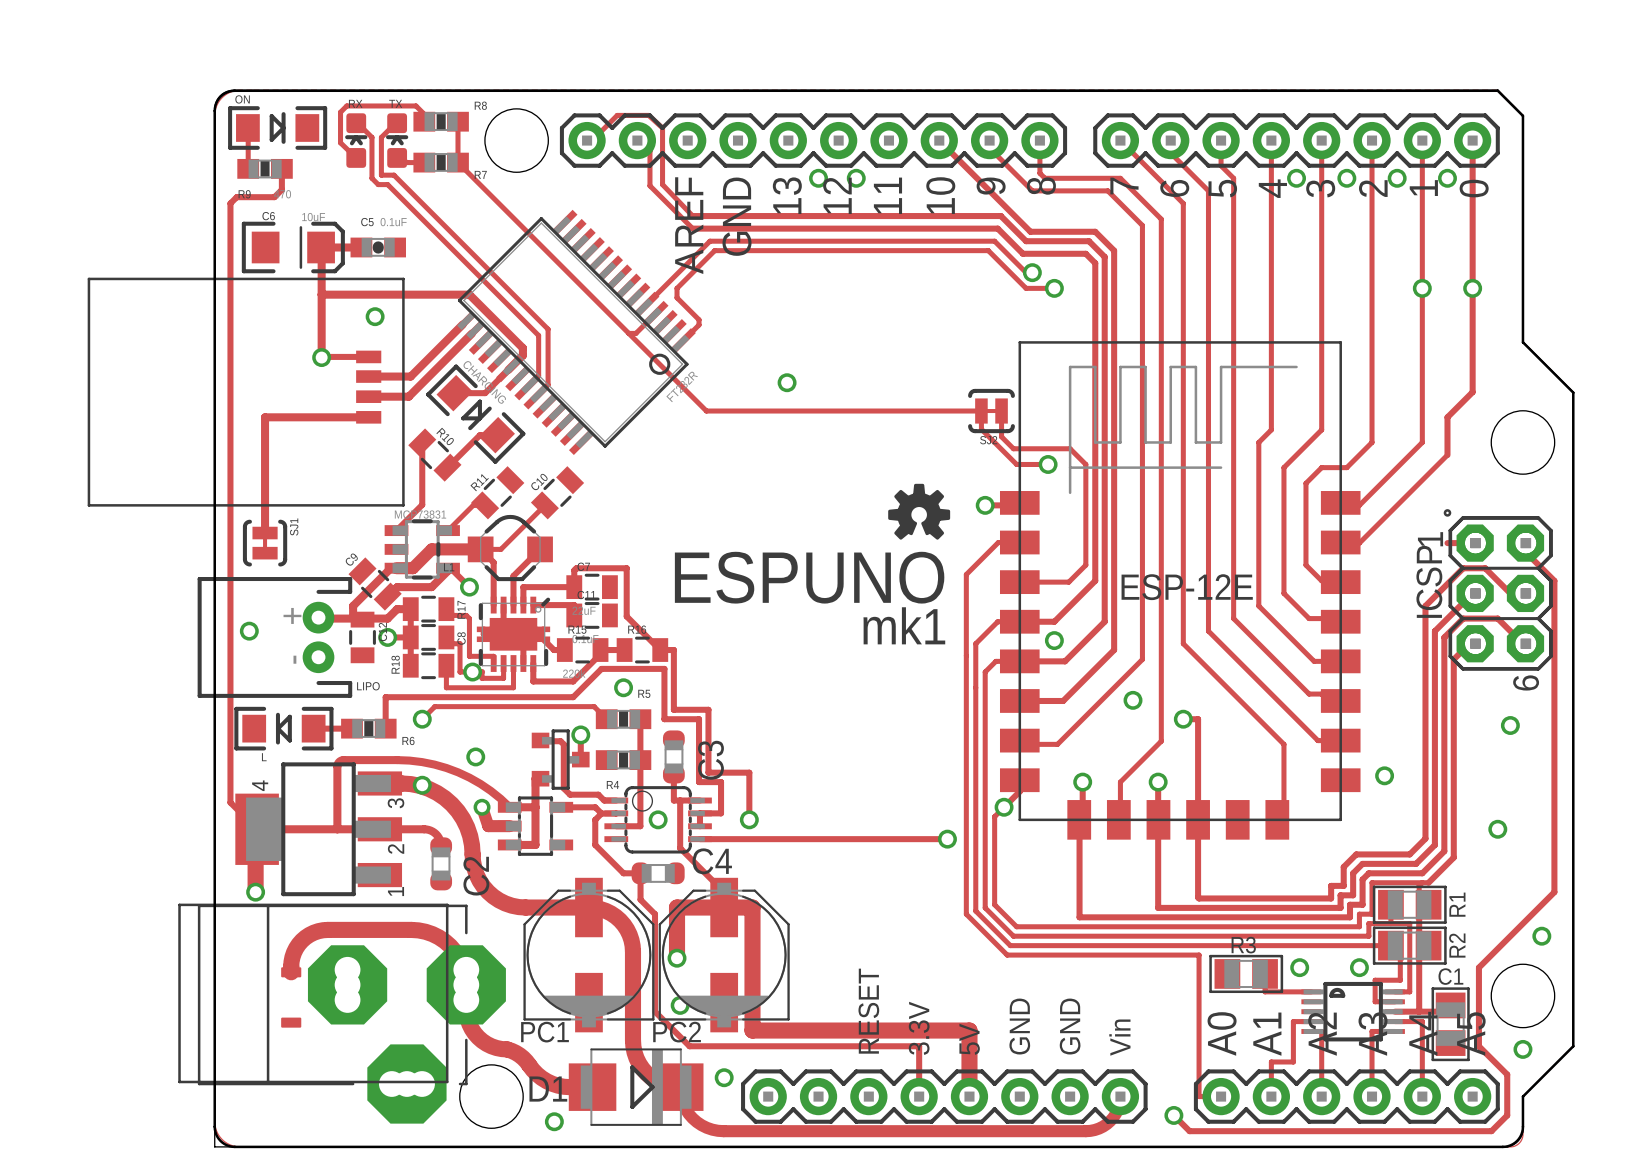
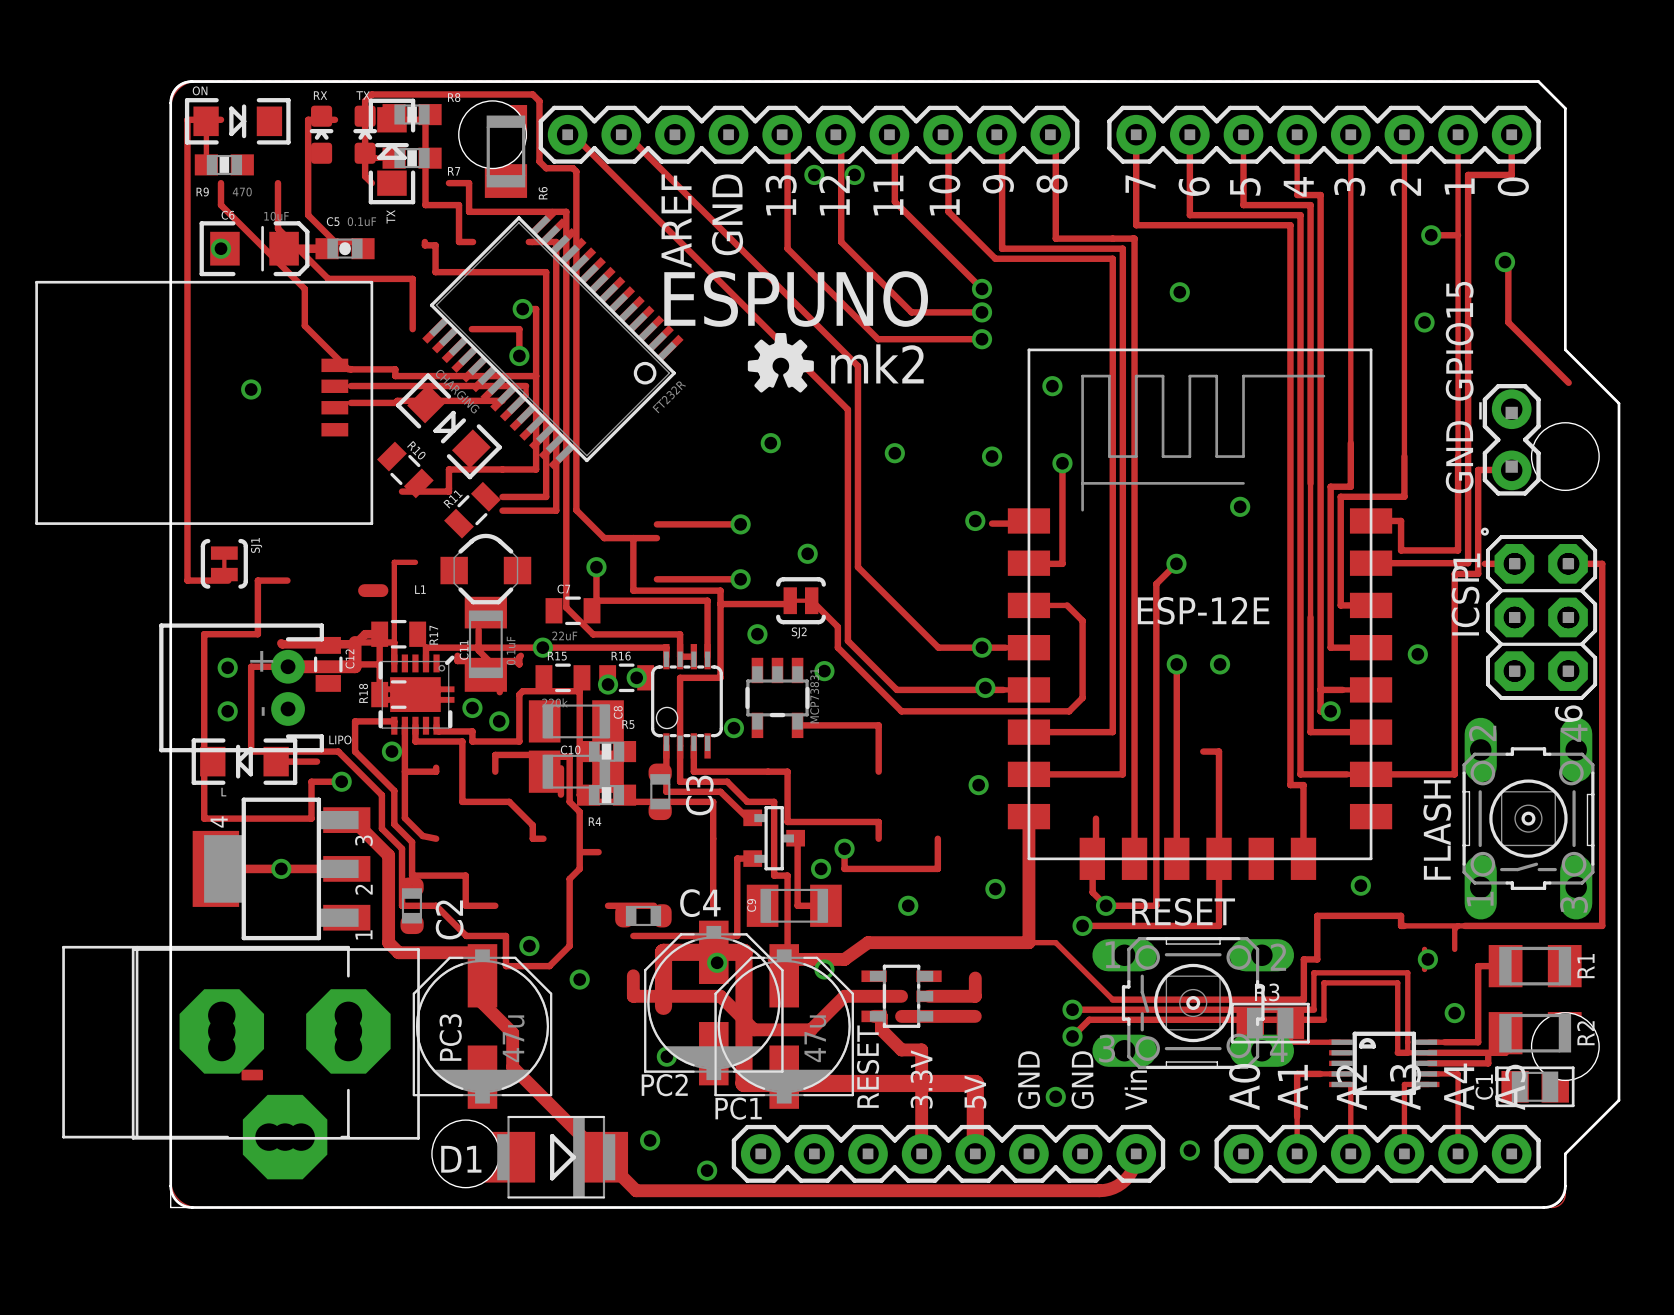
track: (424, 121) (424, 114) (416, 105) (346, 105) (340, 112) (340, 142) (356, 157) -> none
track: (457, 121) (457, 162) (706, 411) (981, 411) (981, 429) (1016, 464) (1048, 464) -> none
track: (357, 122) (371, 137) (371, 178) (378, 184) (387, 184) (538, 335) (538, 376) (526, 388) -> none
track: (397, 123) (381, 137) (381, 175) (393, 175) (548, 329) (548, 376) -> (350, 386) (526, 386)
track: none -> (334, 119) (308, 119) (308, 215) (334, 241) (365, 241)
track: none -> (391, 119) (425, 119) (425, 205) (459, 205) (459, 241) (473, 241)
track: (587, 140) (592, 140) (617, 115) (648, 115) (662, 127) (662, 184) (692, 216) (1000, 216) (1026, 241) (1088, 241) (1104, 256) (1104, 621) (1065, 661) (1019, 661) -> none
track: none -> (573, 134) (847, 409) (847, 640) (896, 689) (1003, 689)
track: (637, 140) (649, 151) (649, 185) (692, 228) (997, 228) (1022, 253) (1085, 253) (1095, 263) (1095, 580) (1054, 621) (1019, 621) -> none
track: none -> (787, 134) (787, 248) (878, 339) (982, 339)
track: none -> (841, 134) (841, 241) (911, 312) (982, 312)
track: none -> (894, 134) (894, 201) (982, 288)
track: (939, 140) (1030, 231) (1095, 231) (1114, 250) (1114, 650) (1063, 700) -> (948, 134) (948, 211) (995, 258) (1112, 258) (1112, 732) (1075, 732)
track: (989, 140) (989, 148) (1032, 190) (1107, 190) (1142, 225) (1142, 659) (1057, 744) (1023, 744) (1019, 740) -> (1002, 134) (1002, 248) (1122, 248) (1122, 774) (1028, 774)
track: (1039, 140) (1039, 173) (1044, 178) (1120, 178) (1161, 219) (1161, 741) (1120, 782) (1120, 818) (1118, 819) -> (1055, 134) (1055, 238) (1134, 238) (1134, 858)
track: (1120, 140) (1183, 203) (1183, 643) (1283, 744) (1283, 813) (1277, 819) -> (1136, 134) (1136, 225) (1290, 225) (1290, 785) (1303, 785) (1303, 858)
track: (1170, 153) (1208, 190) (1208, 631) (1317, 740) -> (1189, 148) (1189, 215) (1300, 215) (1300, 774) (1346, 774)
TX: none -> (391, 151)
track: (1221, 165) (1233, 178) (1233, 618) (1309, 694) (1321, 694) (1328, 700) -> (1243, 161) (1243, 205) (1310, 205) (1310, 483)
track: (281, 168) (281, 189) (274, 197) (236, 197) (230, 203) -> (220, 119) (187, 119) (187, 201)
via: (1296, 178) -> none
via: (1346, 178) -> none
via: (1397, 178) -> none
via: (1447, 178) -> none
track: (1472, 178) (1472, 392) (1447, 417) (1447, 455) (1359, 543) (1340, 542) -> (1511, 174) (1468, 174) (1468, 563) (1371, 563)
track: none -> (220, 183) (220, 205) (304, 288) (304, 325) (348, 369) (350, 369)
track: none -> (277, 183) (277, 228) (328, 278) (412, 278) (412, 329)
track: none -> (371, 183) (365, 176) (365, 101) (371, 94) (532, 94) (539, 101) (539, 161) (546, 168) (573, 168) (576, 171) (576, 510) (604, 538) (656, 538)
track: none -> (448, 183) (469, 183) (469, 211) (566, 211) (566, 607)
track: (1271, 197) (1271, 429) (1258, 442) (1258, 606) (1314, 661) -> (1297, 195) (1320, 195) (1320, 711) (1330, 711)
track: none -> (1431, 235) (1458, 235)
via: none -> (1431, 235)
track: none -> (424, 241) (424, 245) (435, 245) (435, 272) (546, 272) (546, 496) (502, 496)
track: none -> (528, 241) (556, 241) (556, 510) (502, 510)
via: none -> (220, 248)
track: (321, 247) (321, 356) -> none
track: none -> (1505, 262) (1508, 265) (1508, 322) (1568, 382)
via: none -> (1505, 262)
track: (1032, 272) (1026, 272) (994, 241) (709, 241) (647, 303) -> none
via: (1032, 272) -> none
via: none -> (982, 288)
track: (1054, 288) (1026, 288) (988, 250) (714, 250) (677, 288) (677, 297) (699, 319) (699, 324) (683, 340) -> none
via: (1054, 288) -> none
via: none -> (1179, 292)
via: (1422, 288) -> none
via: (1472, 288) -> none
track: (321, 294) (469, 294) (522, 348) (522, 355) (485, 393) (454, 393) -> none
track: none -> (522, 309) (536, 309) (536, 469) (448, 469) (448, 491) (402, 491)
via: none -> (522, 309)
via: none -> (982, 312)
track: (656, 313) (635, 333) (628, 333) -> none
via: (375, 316) -> none
via: none -> (1424, 322)
track: none -> (471, 329) (519, 329) (519, 355)
track: (462, 324) (410, 376) (368, 376) -> none
via: none -> (982, 339)
track: (471, 333) (408, 396) (368, 396) -> none
via: none -> (519, 355)
text: none -> mk2 (877, 363)
track: (321, 356) (368, 356) -> none
via position: (321, 357) -> (251, 389)
track: none -> (350, 369) (395, 369) (395, 376) (536, 376)
via: none -> (1052, 386)
via position: (787, 382) -> (770, 443)
track: none -> (502, 400) (350, 402)
SJ2 position: (991, 411) -> (800, 600)
track: (1001, 411) (1001, 436) (1013, 448) (1070, 448) (1085, 464) (1085, 565) (1068, 582) (1055, 582) -> (811, 605) (811, 600) (837, 626) (837, 647) (901, 711) (1069, 711) (1082, 697) (1082, 620) (1067, 605)
track: (368, 417) (265, 417) (265, 533) -> none
GND_GPIO15: none -> (1511, 439)
track: (1321, 429) (1283, 467) -> (1350, 443) (1350, 486) (1330, 486) (1330, 647) (1371, 647)
track: (496, 435) (479, 435) (447, 467) -> none
via: none -> (894, 453)
track: (422, 442) (422, 504) (396, 530) -> none
via: none -> (992, 456)
track: (1372, 442) (1346, 467) (1321, 467) (1305, 483) (1305, 565) (1321, 580) (1340, 582) -> (1404, 456) (1404, 496) (1340, 496) (1340, 605) (1371, 605)
track: (1422, 442) (1359, 505) (1343, 505) (1340, 502) -> (1458, 456) (1458, 550) (1401, 550) (1401, 520) (1371, 520)
track: none -> (1511, 469) (1478, 469) (1478, 573) (1454, 573) (1454, 774) (1371, 774)
via position: (1048, 464) -> (1062, 463)
C10 footprint: [530, 466, 585, 520] -> [528, 750, 624, 793]
via: none -> (1240, 506)
track: (485, 505) (473, 505) (448, 530) -> none
track: (544, 505) (500, 549) (480, 549) -> none
via position: (985, 505) -> (975, 520)
track: none -> (656, 524) (740, 524)
via: none -> (740, 524)
drawing position: (919, 511) -> (780, 362)
track: none -> (633, 538) (633, 590) (720, 590) (720, 677) (680, 677) (680, 781) (727, 781) (747, 801) (774, 801) (774, 875) (787, 875) (787, 959)
via: none -> (807, 553)
track: none -> (415, 562) (394, 562) (394, 663) (394, 642) (355, 642) (355, 666) (251, 666) (251, 751) (338, 751) (381, 795) (381, 828) (402, 848) (402, 905) (436, 905) (466, 935) (505, 935) (505, 966) (549, 966) (569, 946) (569, 878) (579, 868) (579, 811) (569, 801) (569, 756) (544, 756)
track: (1019, 542) (998, 542) (966, 574) (966, 914) (1007, 955) (1199, 955) (1199, 1096) (1221, 1096) -> (1028, 563) (1062, 563) (1062, 463)
via: none -> (1176, 563)
track: (1526, 543) (1526, 552) (1554, 580) (1554, 892) (1478, 967) (1478, 1046) (1507, 1074) (1507, 1115) (1491, 1131) (1189, 1131) (1173, 1115) -> none
track: none -> (596, 567) (596, 600) (707, 600) (707, 656)
via: none -> (596, 567)
part rotation: 0° (422, 549) -> 90° clockwise (777, 697)
part position: (422, 549) -> (777, 697)
track: (480, 549) (493, 562) (493, 605) -> none
track: (480, 549) (431, 549) (412, 568) (390, 568) (353, 606) (353, 618) -> none
track: (540, 549) (513, 575) (513, 605) -> none
C9 footprint: [348, 557, 402, 611] -> [746, 884, 842, 927]
track: none -> (656, 579) (740, 579)
via: none -> (740, 579)
track: (230, 558) (230, 802) (257, 829) (255, 892) -> (187, 580) (228, 580)
track: none -> (287, 580) (257, 580) (257, 634) (204, 634) (204, 818) (311, 818) (311, 781) (341, 781)
track: none -> (790, 600) (790, 604) (720, 604)
text position: ESPUNO (809, 577) -> ESPUNO (796, 299)
track: none -> (566, 607) (593, 634) (680, 634) (680, 656) (693, 656)
track: (469, 587) (450, 568) (448, 568) (448, 570) (431, 587) (397, 587) (387, 596) -> none
via: (469, 587) -> none
track: (1283, 593) (1309, 618) (1337, 618) (1340, 621) -> (1310, 617) (1310, 732) (1358, 732)
track: (1475, 593) (1469, 593) (1469, 596) (1434, 631) (1434, 845) (1416, 863) (1362, 863) (1353, 873) (1353, 895) (1340, 895) (1340, 907) (1158, 907) (1158, 782) -> none
track: (1526, 593) (1510, 593) (1485, 568) (1463, 568) (1425, 606) (1425, 838) (1409, 854) (1356, 854) (1343, 867) (1343, 885) (1331, 885) (1331, 898) (1199, 898) (1198, 882) -> (1082, 925) (1219, 925)
C11 footprint: [566, 602, 618, 629] -> [464, 596, 507, 692]
track: (523, 605) (523, 587) (574, 587) (574, 570) (576, 568) (626, 568) (626, 616) (660, 650) (673, 650) (673, 709) (708, 709) (708, 772) (749, 772) (749, 819) -> none
track: (533, 605) (574, 605) (574, 615) -> none
track: (446, 609) (452, 615) (466, 615) (469, 618) (469, 656) (493, 656) (493, 663) -> none
via: none -> (757, 634)
via: none -> (542, 647)
via: none -> (982, 647)
track: (997, 621) (975, 643) (975, 911) (1010, 945) (1400, 945) (1400, 980) (1375, 980) -> (1005, 647) (938, 647) (857, 567) (857, 366) (626, 134)
C8 footprint: [402, 624, 455, 651] -> [528, 700, 624, 743]
text: mk1 (904, 625) -> none
via: none -> (1417, 654)
track: none -> (666, 656) (666, 647) (426, 647) (426, 663)
via position: (249, 631) -> (227, 667)
part position: (513, 634) -> (415, 694)
LIPO position: (274, 637) -> (241, 687)
via: (387, 637) -> none
track: (446, 637) (452, 643) (460, 643) (460, 672) (482, 672) (482, 678) (503, 678) (503, 663) -> none
track: none -> (1176, 664) (1176, 858)
via: none -> (1176, 664)
via: none -> (1220, 664)
track: (543, 639) (553, 650) (564, 650) -> none
via: (1054, 640) -> none
via: none -> (824, 671)
track: (1475, 643) (1469, 643) (1453, 659) (1453, 857) (1428, 882) -> (1568, 563) (1602, 563) (1602, 925) (1464, 925)
track: (1526, 643) (1522, 643) (1497, 618) (1463, 618) (1444, 637) (1444, 851) (1422, 873) (1368, 873) (1362, 879) (1362, 904) (1350, 904) (1350, 917) (1079, 917) (1079, 851) -> (1176, 563) (1156, 583) (1156, 905) (1106, 905) (1092, 892)
track: (624, 650) (600, 650) (600, 654) (573, 681) (533, 681) (533, 663) -> none
via: none -> (636, 677)
via: none -> (608, 684)
via: none -> (985, 687)
track: (995, 661) (985, 672) (985, 907) (1013, 936) (1296, 936) -> (1072, 1036) (1089, 1019) (1323, 1019) (1323, 982)
track: none -> (1320, 689) (1342, 689)
track: (513, 663) (513, 687) (446, 687) (446, 665) -> none
via position: (472, 672) -> (472, 707)
via: none -> (227, 711)
via: none -> (1330, 711)
via: (623, 687) -> none
via: none -> (499, 721)
track: none -> (394, 725) (394, 721) (355, 721) (355, 751) (394, 790) (394, 824) (412, 842) (412, 875) (465, 875) (465, 905) (495, 905)
track: none -> (404, 725) (404, 818) (422, 835) (436, 838)
track: none -> (415, 725) (415, 741) (462, 741) (462, 801) (509, 801) (532, 825) (532, 838) (543, 838)
track: none -> (436, 725) (438, 731) (472, 731) (472, 741) (519, 741) (519, 694) (522, 691) (579, 691) (579, 795) (586, 801) (713, 801) (713, 905)
track: none -> (797, 725) (878, 725) (878, 771)
via: none -> (733, 728)
via: (1133, 700) -> none
track: none -> (666, 745) (666, 791) (720, 791) (747, 817) (752, 817)
track: none -> (693, 745) (693, 771) (787, 771) (787, 821) (878, 821) (878, 838)
R6 footprint: [341, 718, 397, 739] -> [484, 105, 528, 198]
track: (422, 719) (434, 706) (594, 706) (606, 719) -> none
track: (640, 719) (640, 826) (616, 826) -> none
via: (1183, 719) -> none
track: none -> (544, 754) (495, 754) (495, 771)
via: (1510, 725) -> none
track: (385, 728) (385, 697) (573, 697) (601, 668) (664, 668) (664, 719) (699, 719) (699, 782) (721, 782) (721, 813) (699, 813) (699, 826) -> none
track: none -> (436, 767) (436, 771) (404, 771)
via: (580, 734) -> none
track: (540, 740) (560, 741) (563, 744) (563, 788) (570, 794) (598, 794) (604, 800) (616, 800) -> none
via: none -> (341, 781)
via: none -> (978, 785)
via: (475, 756) -> none
part position: (560, 759) -> (774, 838)
track: (673, 774) (673, 800) (699, 800) -> none
via: (1384, 775) -> none
track: (540, 778) (535, 778) (535, 844) (509, 844) -> none
via: (1082, 782) -> none
via: (1158, 782) -> none
FLASH: none -> (1528, 818)
track: (381, 785) (379, 783) (420, 785) (437, 792) (451, 804) (467, 827) (476, 874) (488, 891) (499, 900) (518, 907) (594, 907) (605, 910) (620, 920) (629, 934) (632, 945) (632, 1040) (636, 1058) (642, 1068) (656, 1080) (667, 1085) (679, 1087) (683, 1104) (688, 1113) (696, 1122) (706, 1127) (723, 1131) -> (355, 821) (388, 855) (388, 942) (398, 952) (482, 952) (482, 1003) (512, 1033) (512, 1067) (636, 1190) (713, 1190)
via: (422, 785) -> none
track: (1019, 791) (994, 816) (994, 904) (1016, 926) (1287, 926) -> (1072, 1009) (1313, 1009) (1313, 972)
track: none -> (1028, 828) (1028, 942)
track: (680, 800) (680, 848) (721, 889) (721, 904) (724, 907) -> none
track: none -> (795, 838) (797, 838) (797, 905) (825, 905)
track: none -> (937, 838) (937, 868) (844, 868) (844, 848)
track: (482, 807) (488, 826) (509, 826) -> none
via: (482, 807) -> none
track: (535, 807) (509, 807) (490, 790) (469, 777) (434, 764) (409, 760) (342, 760) (337, 765) (337, 829) -> none
track: (561, 807) (595, 807) (601, 813) (595, 819) (595, 845) (623, 873) (640, 873) (640, 899) (655, 914) (655, 1011) (689, 1046) (919, 1046) -> (874, 1016) (881, 1016) (881, 1029) (901, 1049) (921, 1049) (921, 1100)
via: (1004, 807) -> none
via: none -> (844, 848)
part rotation: 0° (658, 819) -> 90° counterclockwise (686, 701)
part position: (658, 819) -> (686, 701)
via: (658, 819) -> none
via: (749, 819) -> none
track: none -> (752, 858) (737, 858) (737, 935) (633, 935)
part rotation: 0° (535, 826) -> 180° (901, 996)
part position: (535, 826) -> (901, 996)
via: none -> (281, 868)
track: (379, 829) (428, 829) (437, 835) (441, 846) -> none
via: none -> (821, 868)
via: (1497, 829) -> none
track: (699, 839) (947, 839) -> none
via: (947, 839) -> none
via: none -> (1360, 885)
via: none -> (995, 889)
track: none -> (608, 905) (654, 905)
via: none -> (908, 905)
via: none -> (1106, 905)
via: none -> (1082, 925)
track: (1372, 882) (1372, 914) (1359, 914) (1359, 926) -> (1407, 1029) (1407, 972) (1391, 972)
track: none -> (1404, 925) (1401, 925) (1401, 915) (1317, 915) (1317, 959) (1303, 959) (1303, 999) (1112, 999) (1055, 942) (1028, 942)
R1 footprint: [1372, 885, 1447, 924] -> [1488, 945, 1582, 988]
via: (255, 892) -> none
track: none -> (1028, 942) (868, 942) (844, 959) (774, 959) (787, 959)
via: none -> (529, 946)
track: (1428, 904) (1419, 904) (1419, 1011) -> none
via: none -> (1427, 959)
via: none -> (717, 962)
track: none -> (1505, 966) (1478, 966) (1478, 1042) (1444, 1042)
via: none -> (824, 969)
R2 footprint: [1372, 926, 1447, 965] -> [1488, 1012, 1582, 1055]
track: none -> (633, 975) (633, 996) (720, 996) (754, 1029) (811, 1029) (844, 996) (901, 996)
track: none -> (975, 978) (975, 996) (929, 996)
via: none -> (579, 979)
track: (1365, 936) (1368, 936) (1368, 923) (1409, 923) (1409, 991) -> (1397, 982) (1397, 1052) (1407, 1052)
via: (1541, 936) -> none
PC1 position: (588, 955) -> (784, 1026)
RESET: none -> (1193, 1003)
via: (677, 958) -> none
via: none -> (1072, 1009)
via: none -> (1454, 1013)
track: none -> (901, 1016) (975, 1016)
via: (1299, 967) -> none
via: (1359, 967) -> none
track: (291, 972) (292, 957) (296, 948) (305, 937) (318, 931) (411, 929) (432, 934) (450, 946) (462, 963) (465, 977) (467, 1019) (478, 1037) (491, 1046) (507, 1049) (519, 1055) (537, 1074) (552, 1083) (564, 1086) (592, 1087) -> none
C1 name position: C1 (1450, 976) -> C1 (1484, 1087)
PC3: none -> 47u (482, 1026)
track: none -> (1505, 1033) (1505, 1052) (1428, 1052)
via: none -> (1072, 1036)
PC1 value: none -> 47u (815, 1038)
part position: (351, 1014) -> (226, 1062)
track: (1293, 1021) (1293, 1061) (1271, 1061) -> (1320, 1073) (1297, 1073) (1297, 1116)
C1 rotation: 0° (1450, 1024) -> 90° clockwise (1535, 1086)
C1 position: (1450, 1024) -> (1535, 1086)
via: none -> (1055, 1096)
track width: thin (919, 1046) (919, 1096) -> thick (921, 1100) (921, 1153)
via: (1522, 1049) -> none
via: (724, 1077) -> none
via: none -> (650, 1140)
D1 position: (636, 1087) -> (556, 1157)
via: none -> (707, 1170)
via position: (1173, 1115) -> (1189, 1150)
via: (554, 1121) -> none

